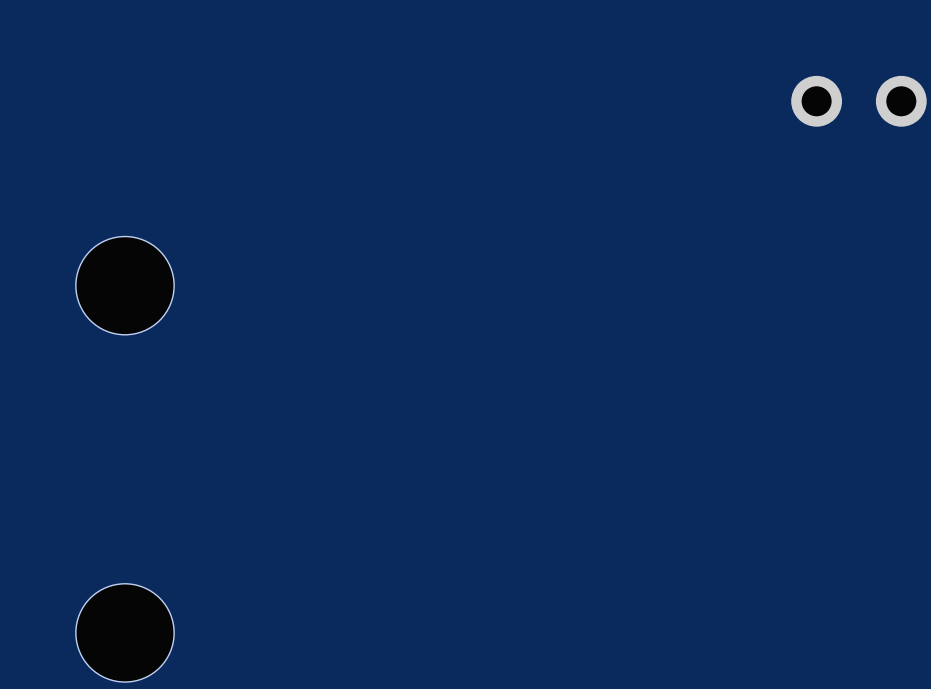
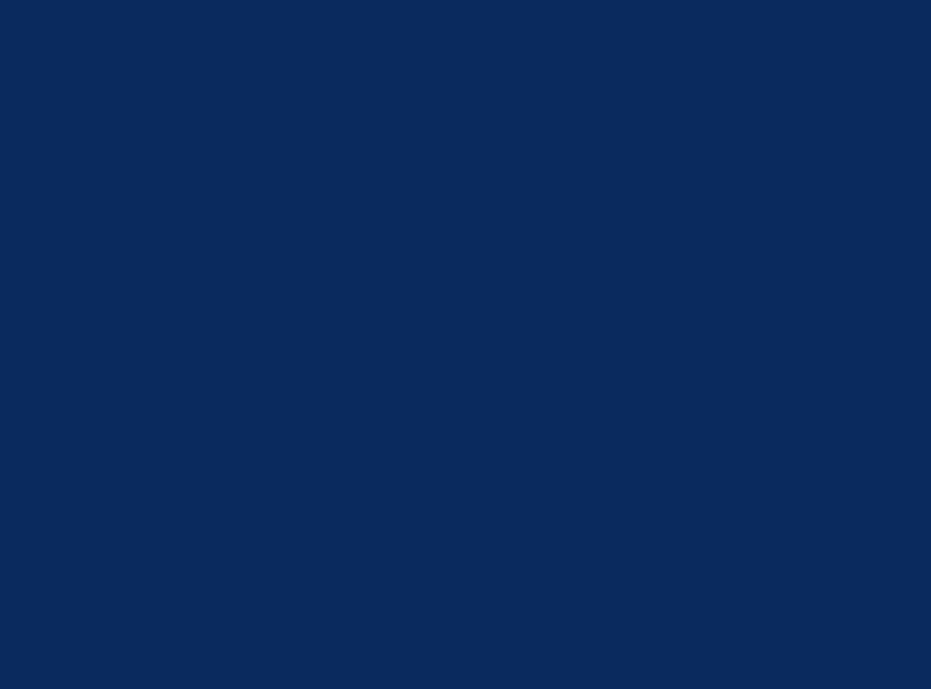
part: (858, 101) -> none
part: (124, 285) -> none
part: (124, 632) -> none

